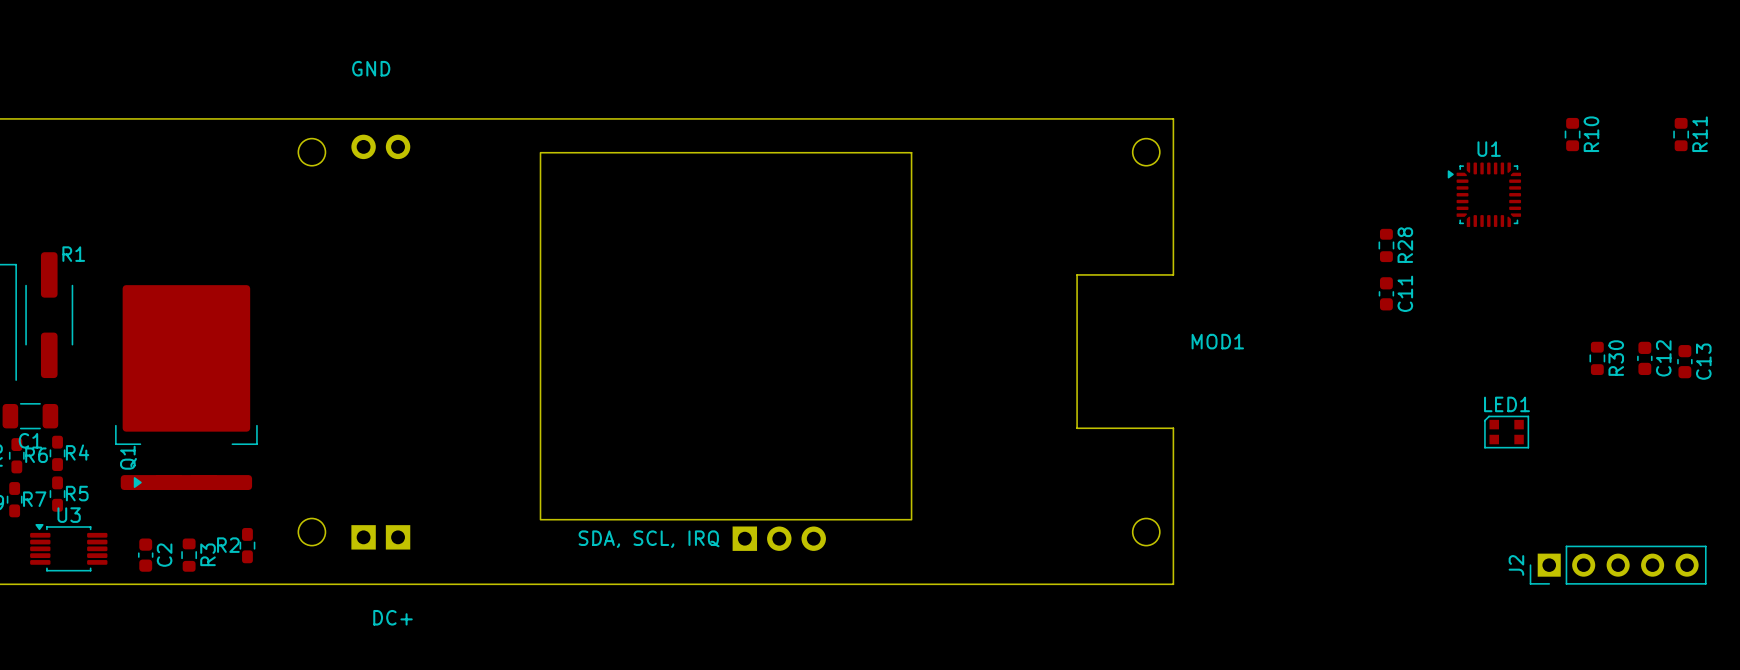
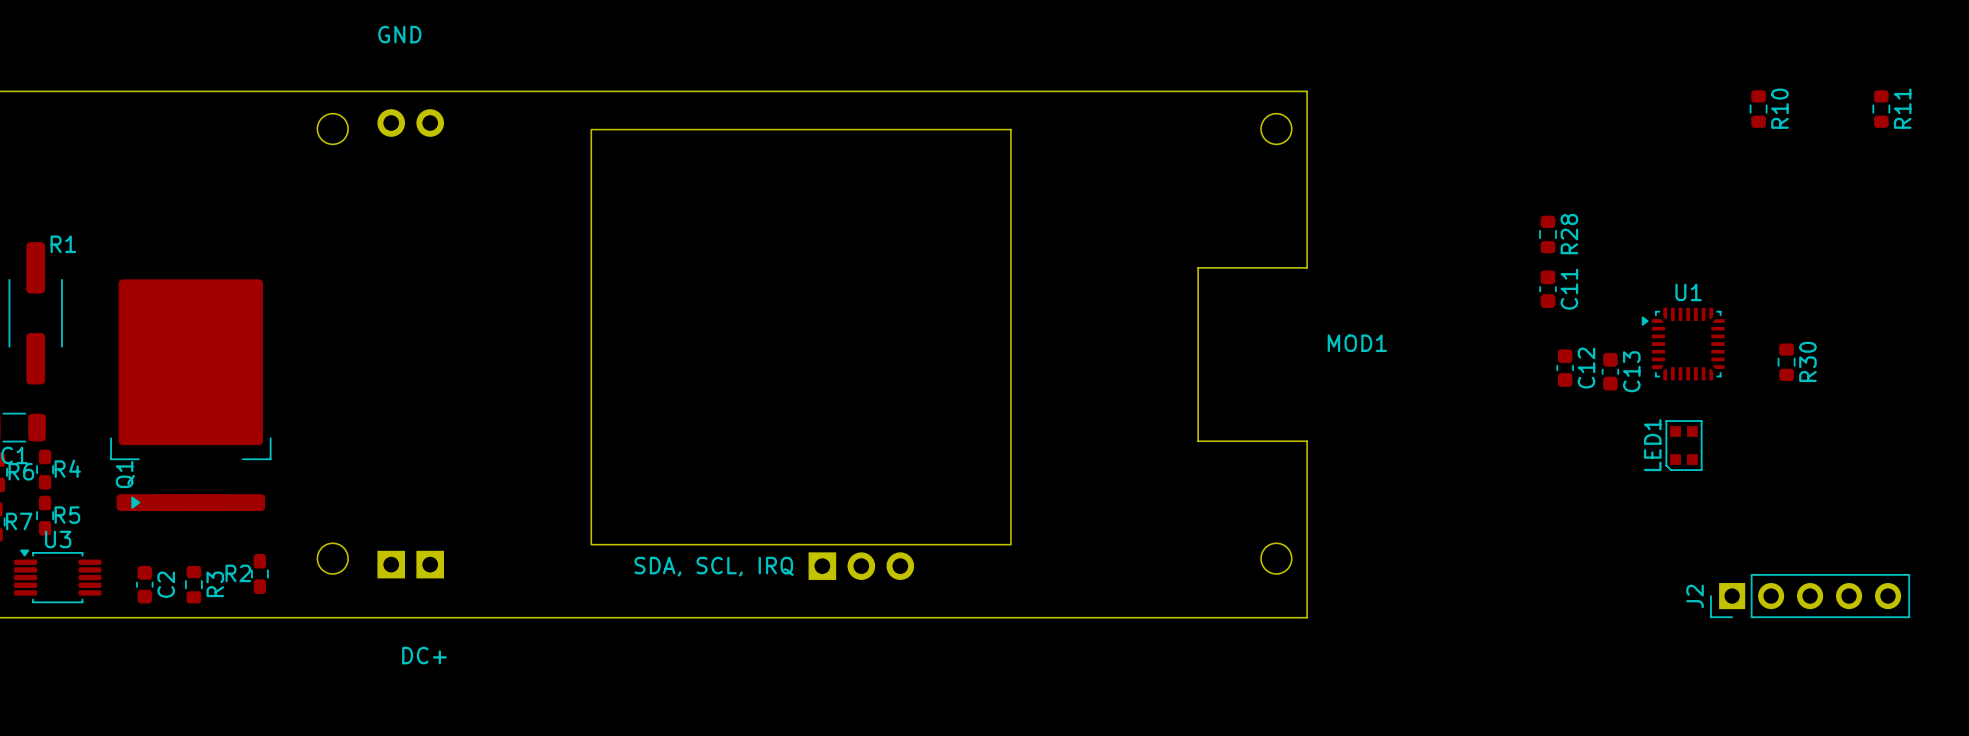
U1 position: (1484, 194) -> (1683, 344)
C12 position: (1644, 358) -> (1565, 368)
C13 position: (1684, 361) -> (1610, 371)
LED1 rotation: 0° (1506, 432) -> 90° counterclockwise (1684, 445)

